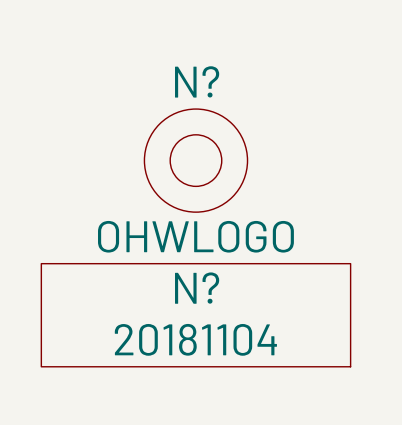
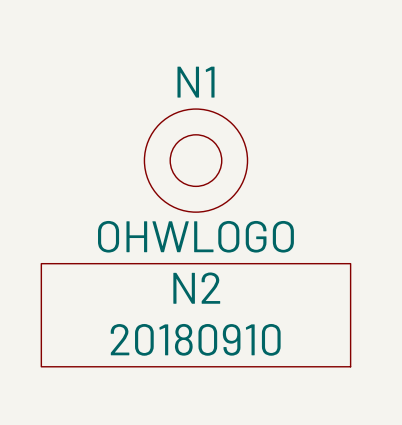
N? name: N? (197, 81) -> N1 (196, 82)
N? name: N? (197, 288) -> N2 (196, 288)
N? value: 20181104 (195, 339) -> 20180910 (195, 339)

